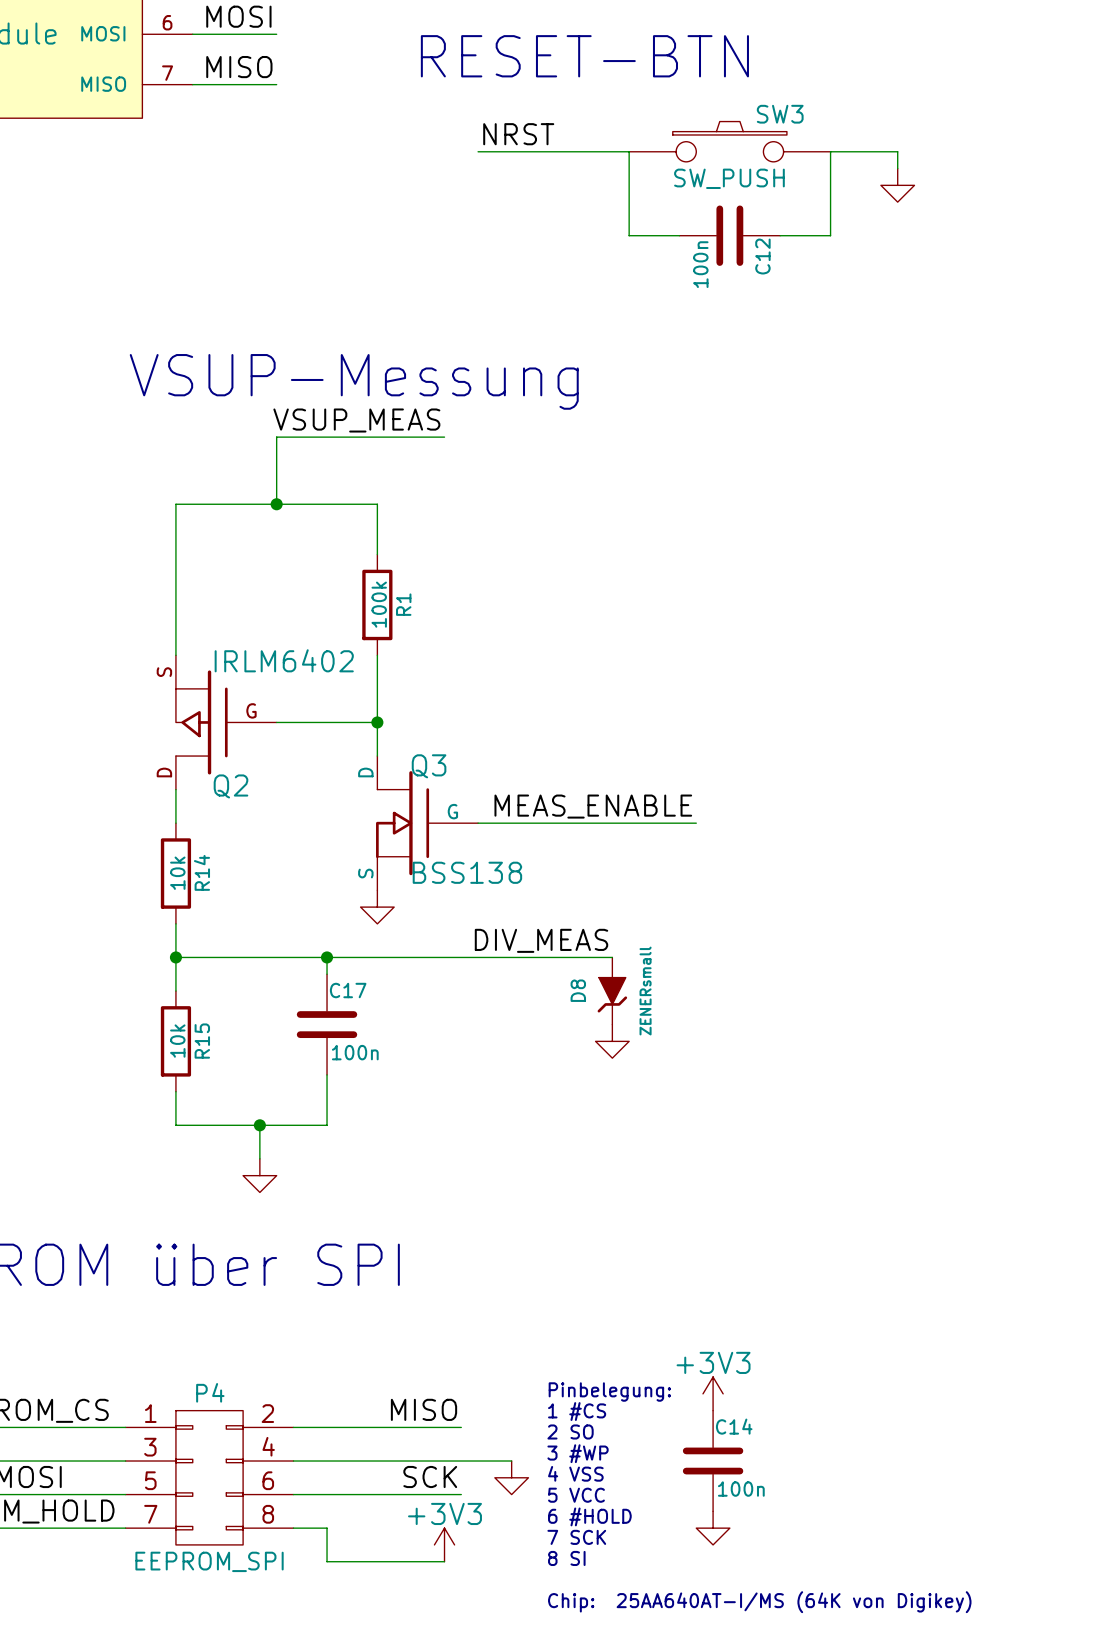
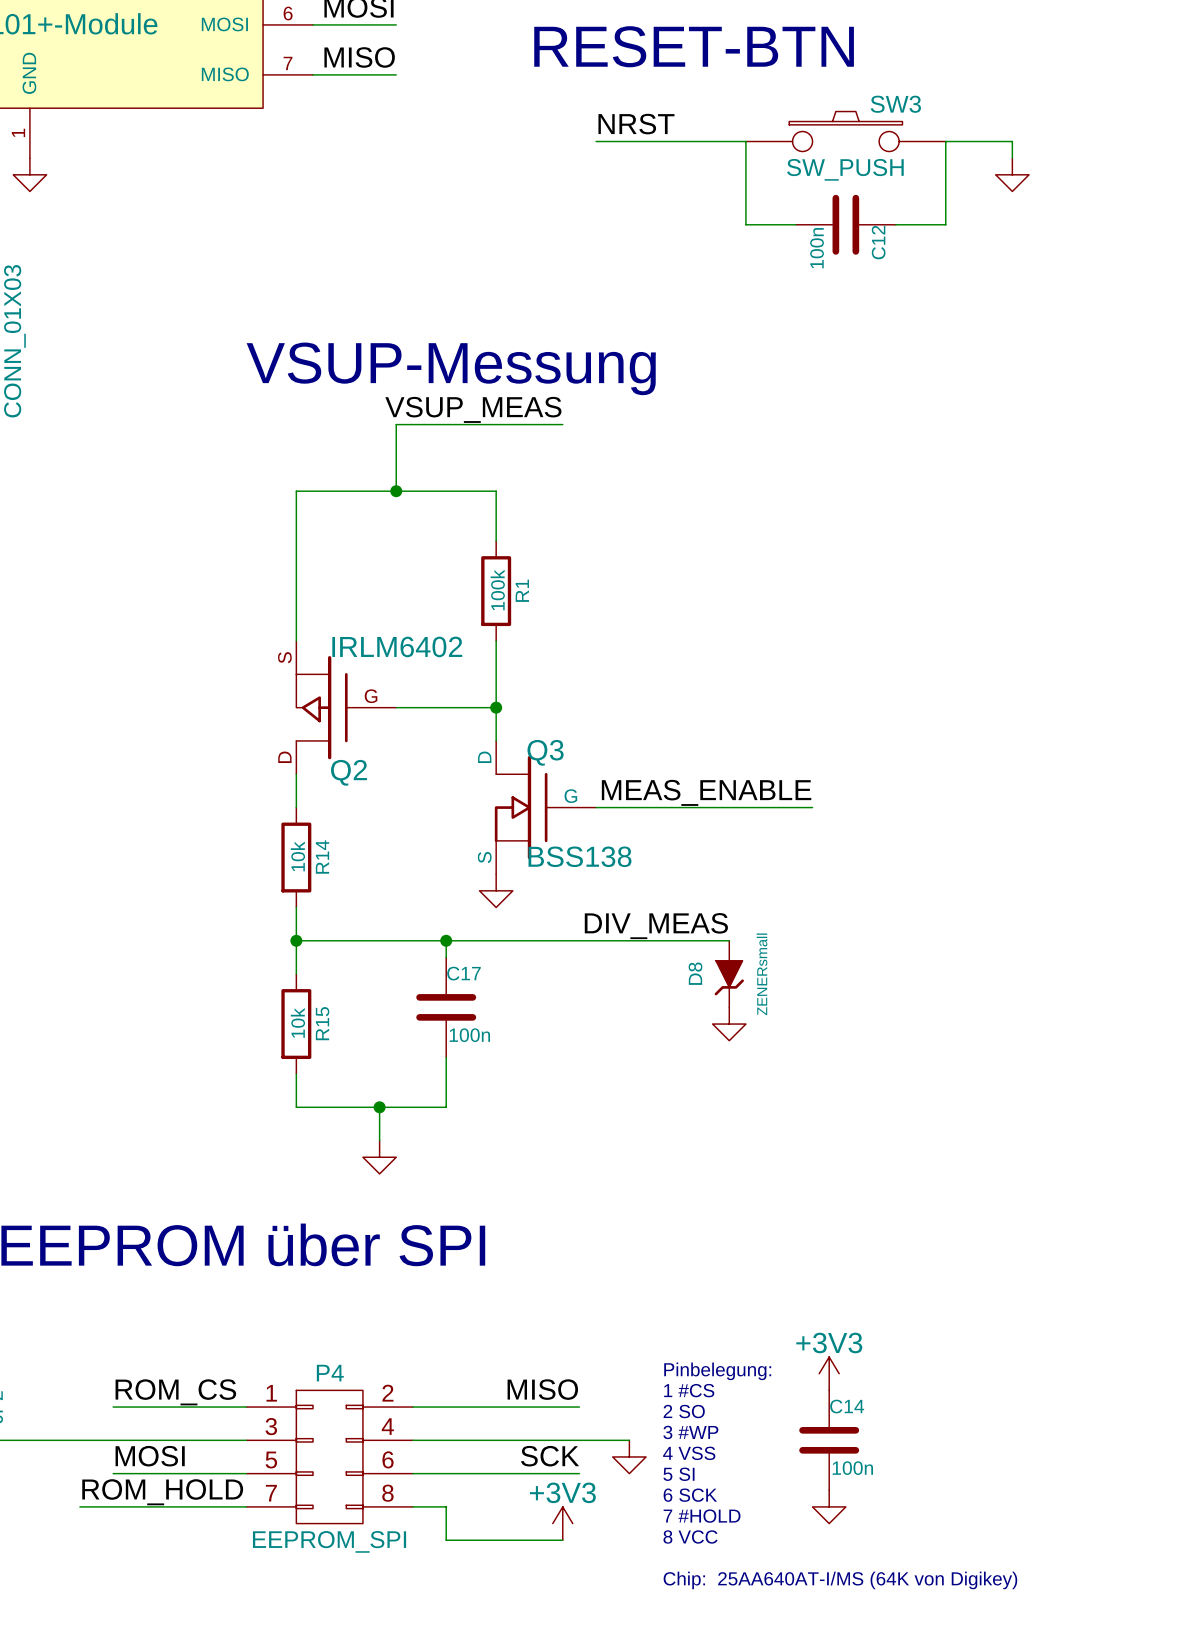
text: 5 VCC (576, 1495) -> 5 SI (678, 1474)
text: 6 #HOLD (589, 1516) -> 6 SCK (690, 1495)
text: 7 SCK (576, 1537) -> 7 #HOLD (702, 1516)
text: 8 SI (566, 1558) -> 8 VCC (690, 1537)

